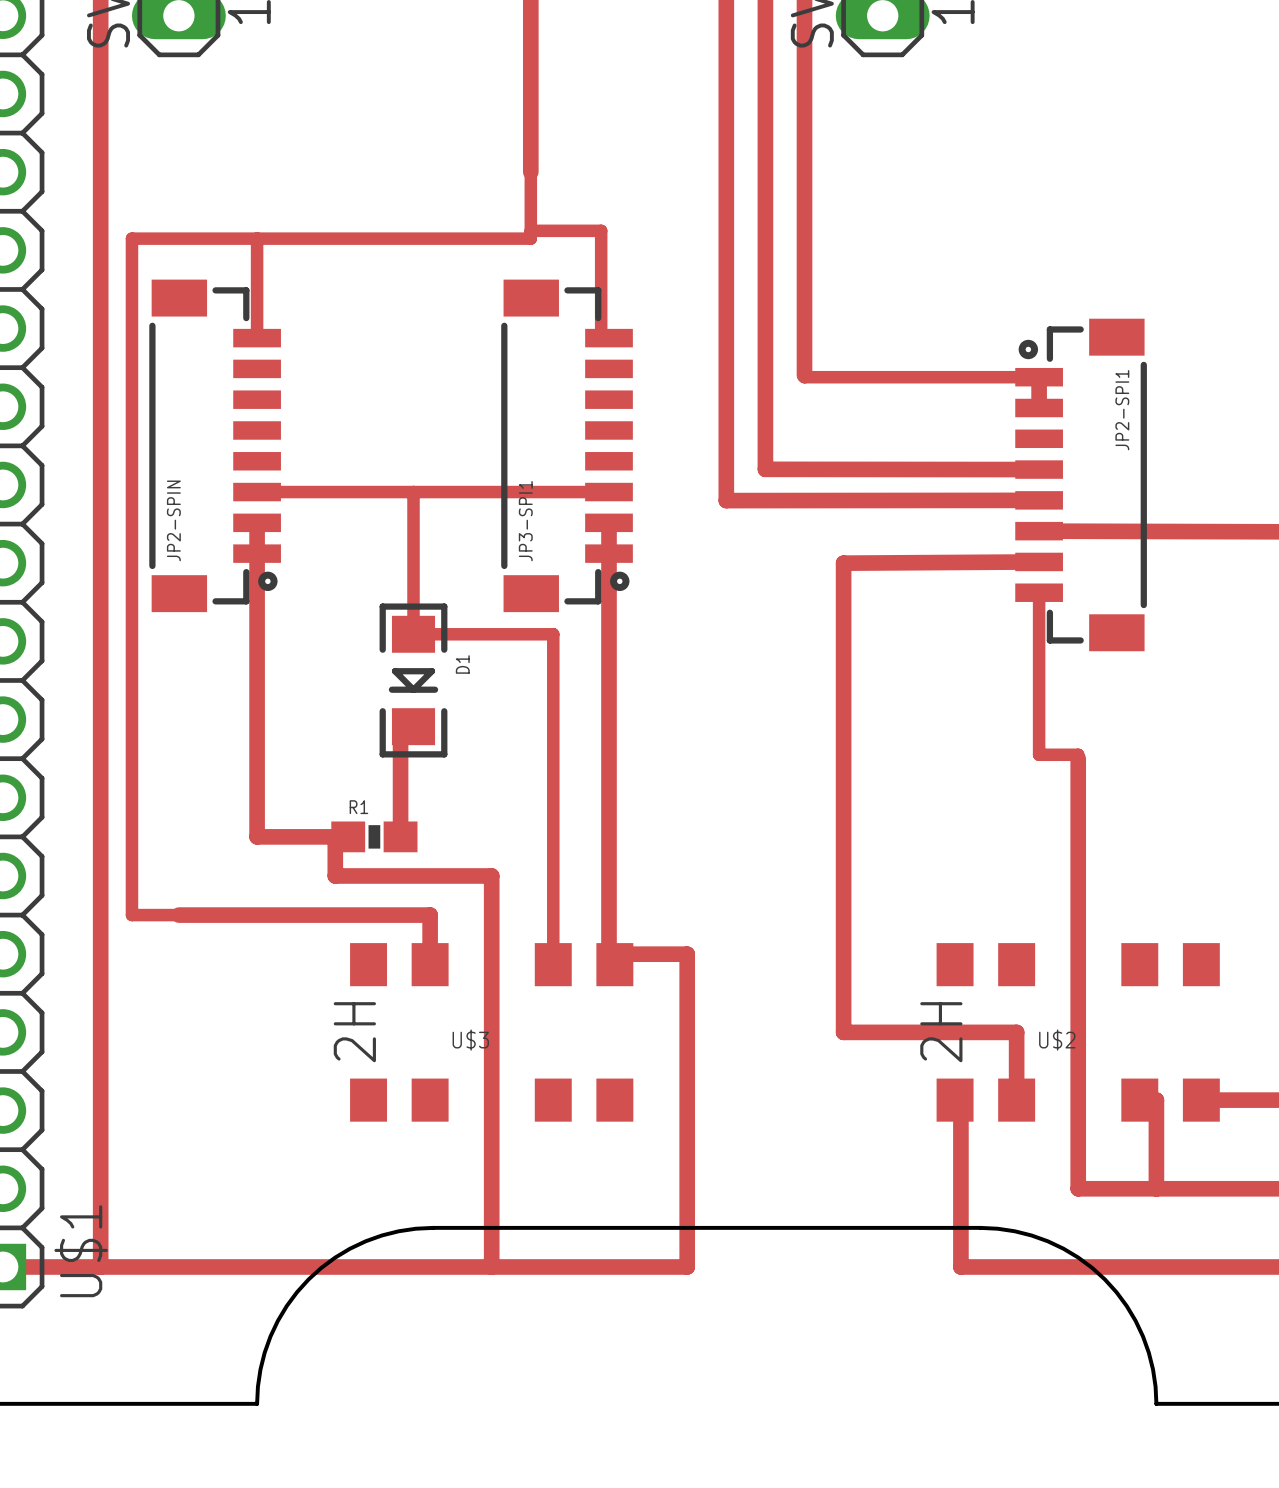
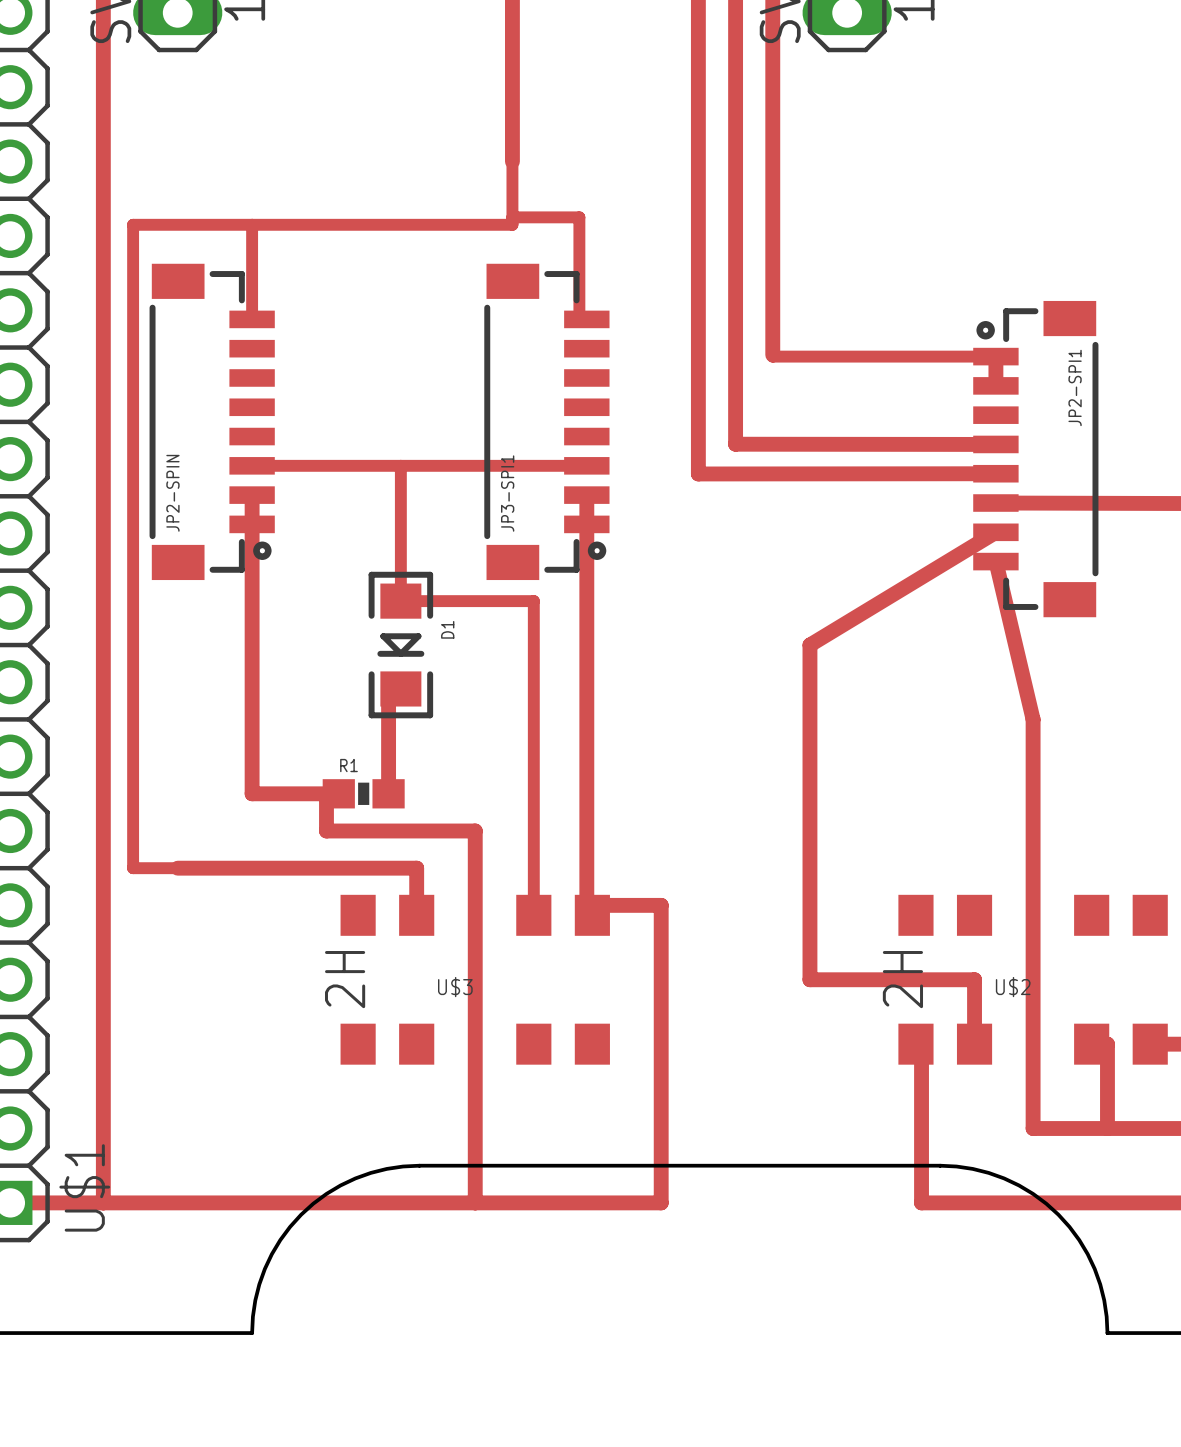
track: (1039, 561) (843, 563) (843, 680) -> (995, 532) (809, 645)
track: (1039, 592) (1039, 754) (1078, 754) (1078, 758) -> (995, 561) (1033, 719)

